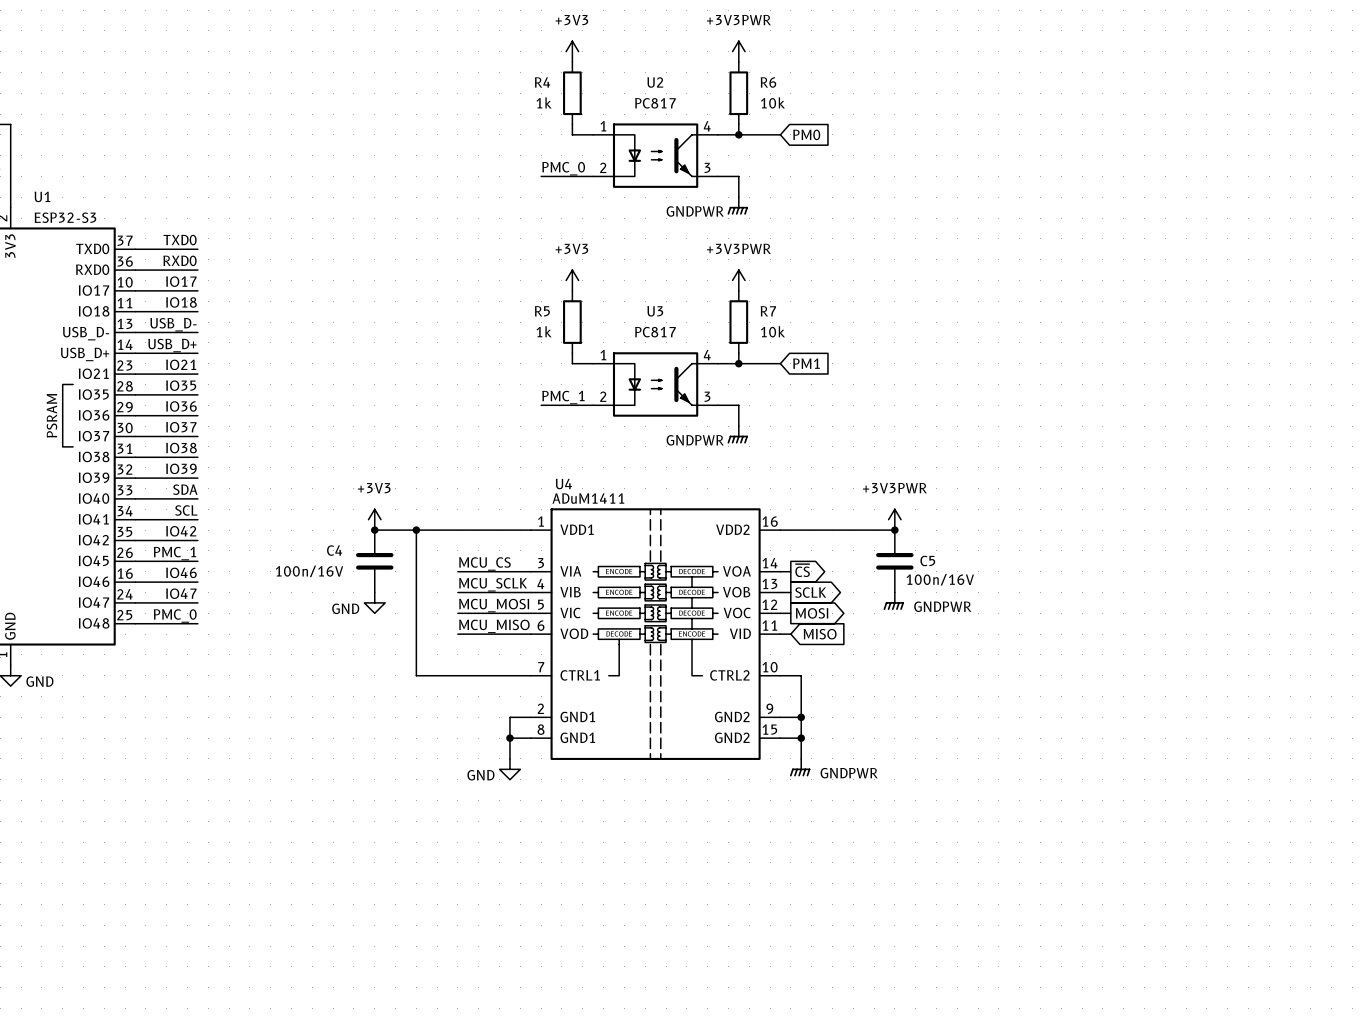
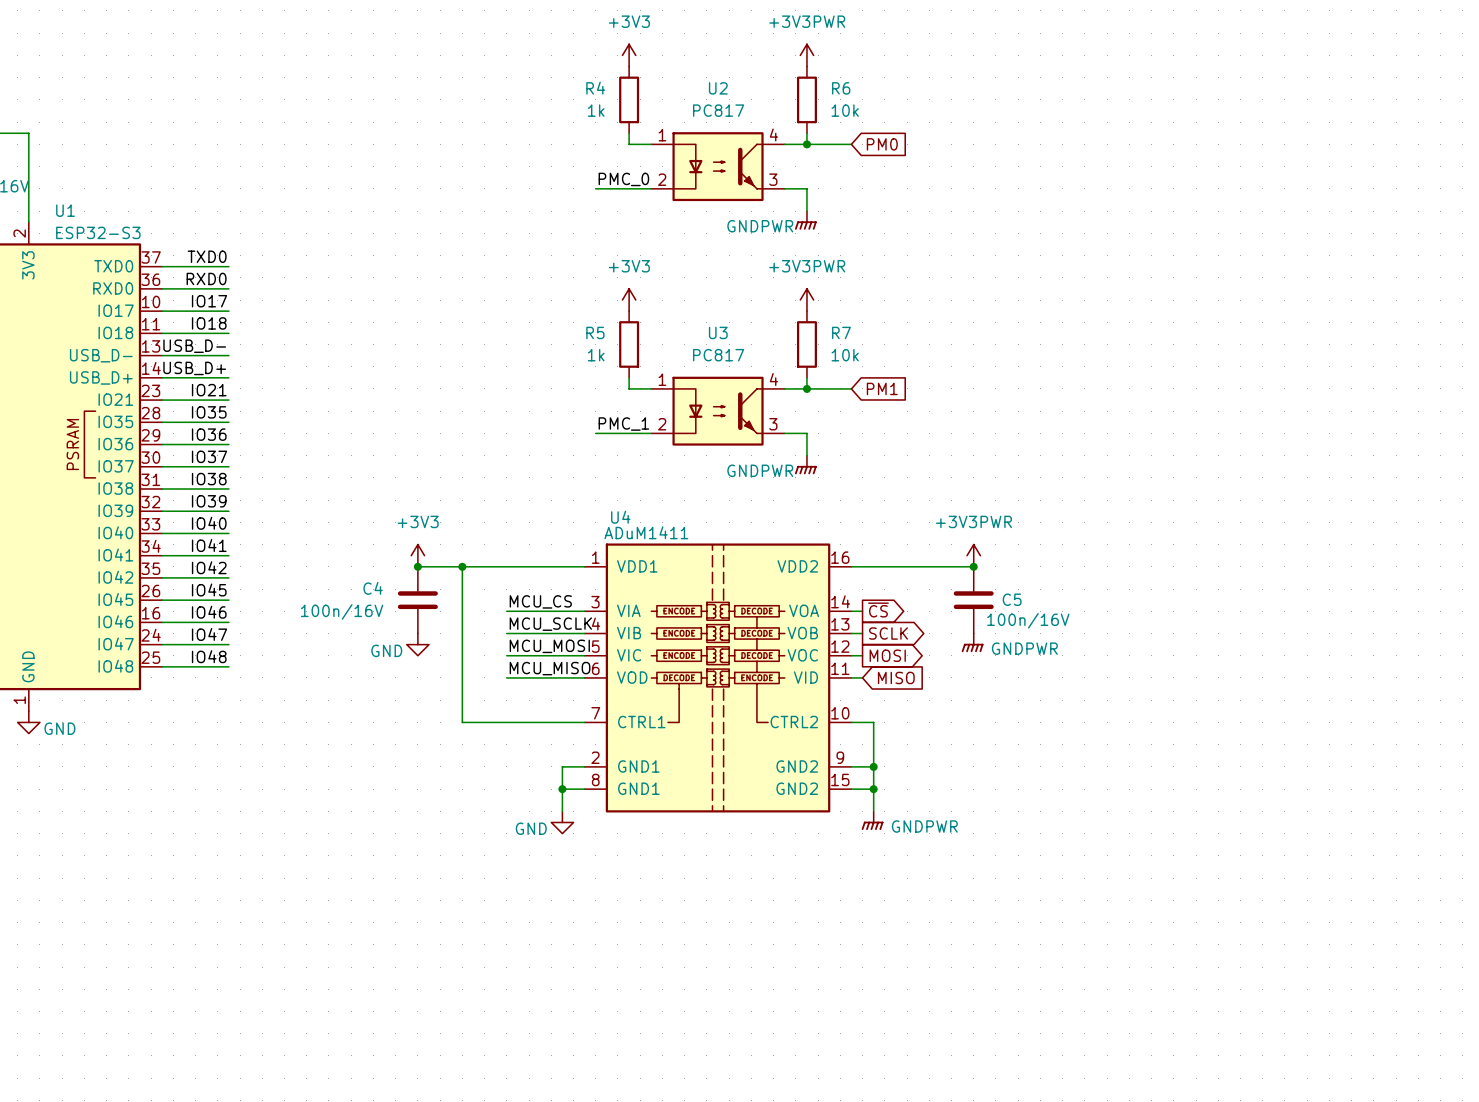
label: SDA (185, 489) -> IO40 (209, 523)
label: SCL (186, 510) -> IO41 (209, 545)
label: PMC_1 (175, 553) -> IO45 (209, 589)
label: PMC_0 (175, 615) -> IO48 (209, 656)

